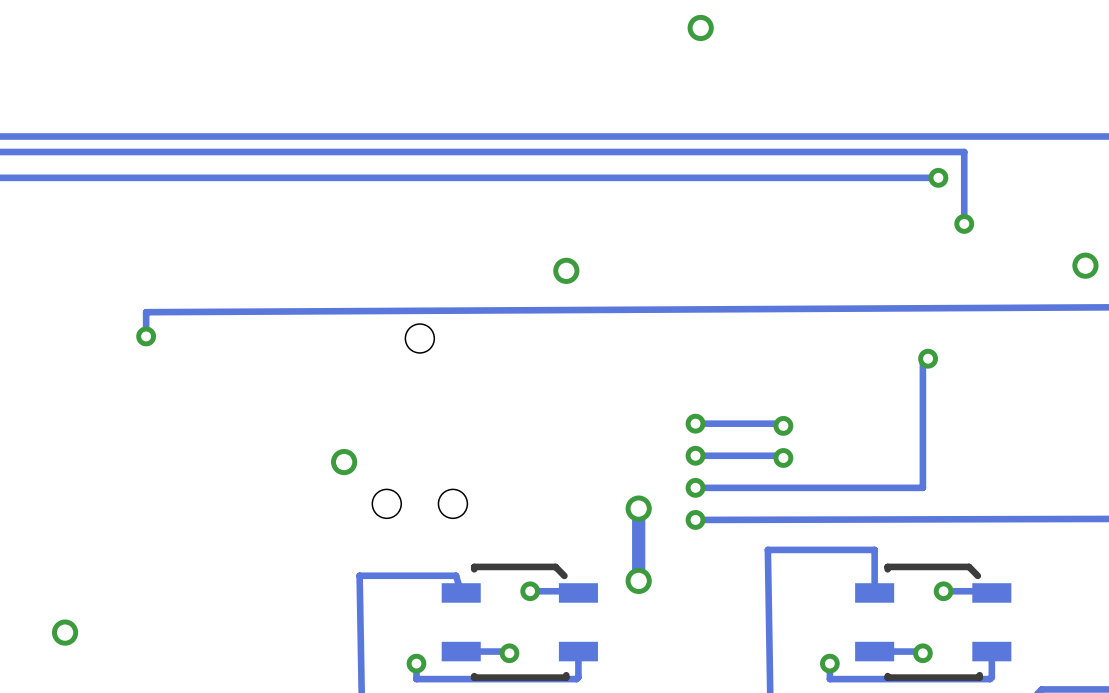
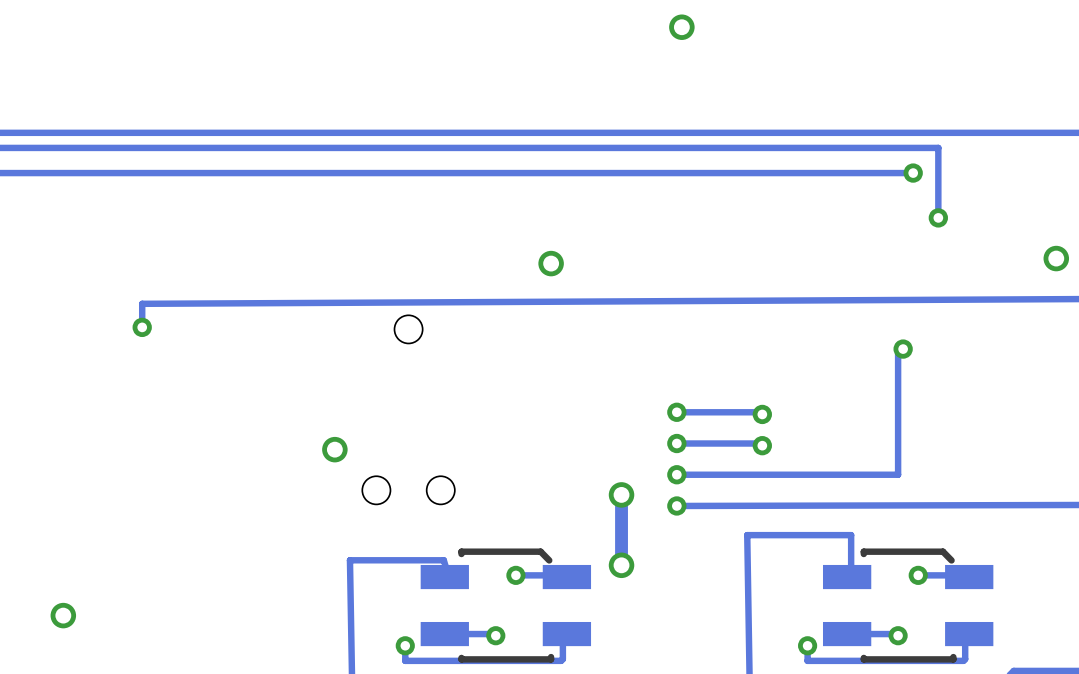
part footprint: [441, 563, 598, 681] -> [420, 548, 592, 663]
part footprint: [855, 563, 1012, 681] -> [822, 548, 994, 663]

